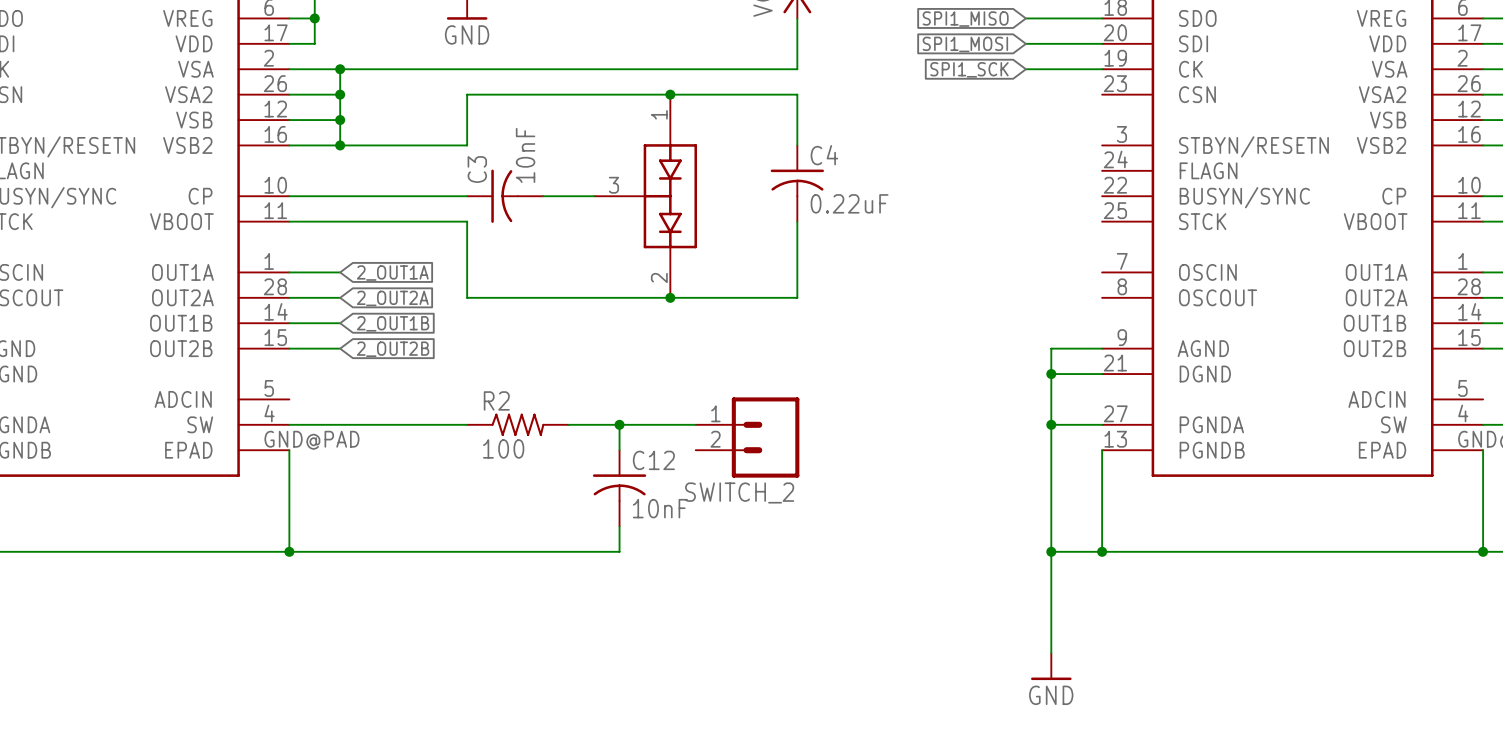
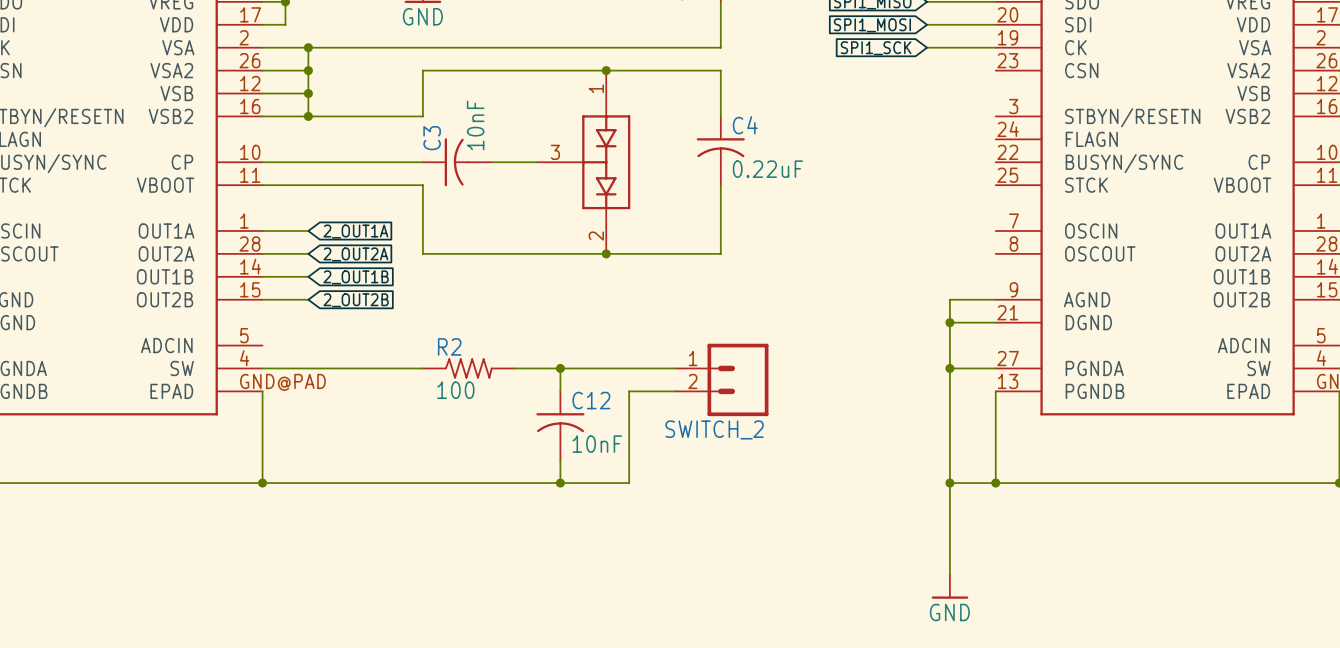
SWITCH_2 position: (747, 437) -> (721, 379)
wire: none -> (674, 391) (629, 391) (629, 483) (560, 483)
junction: none -> (560, 483)

